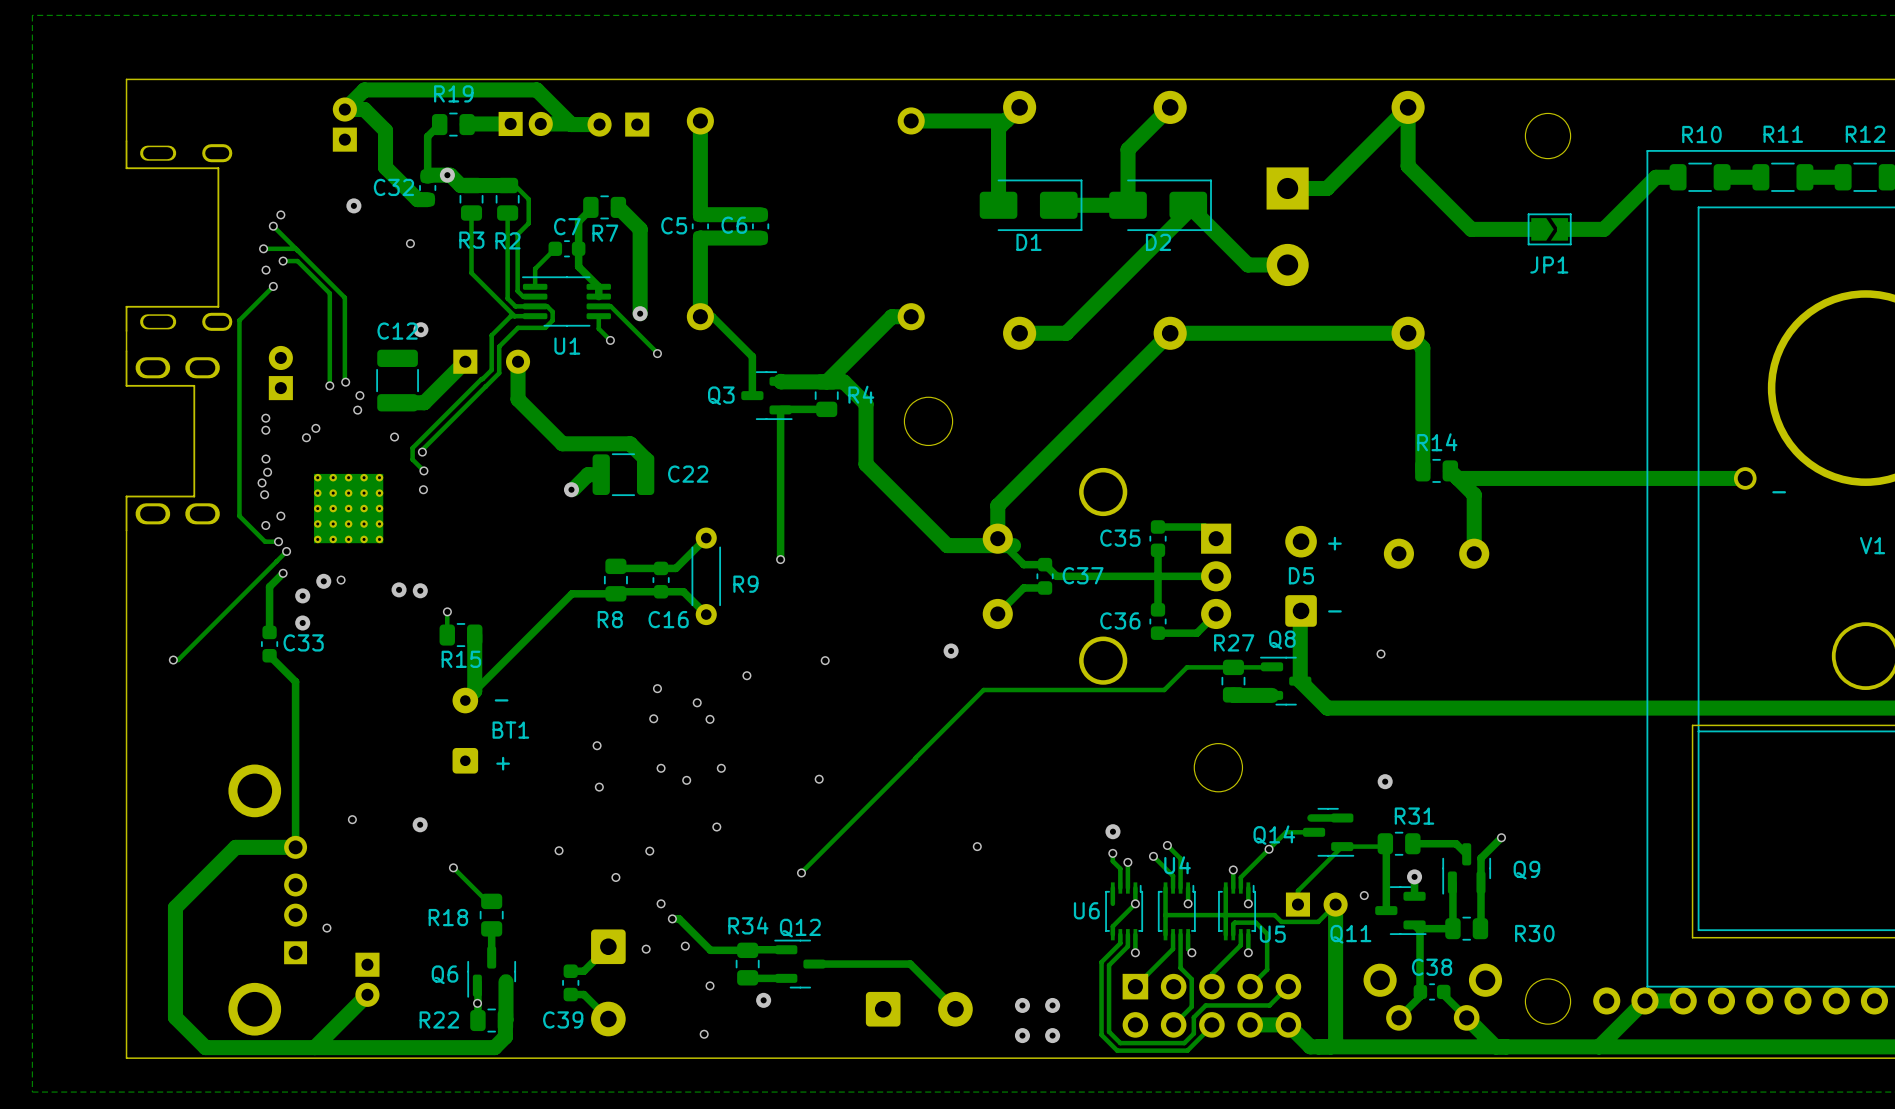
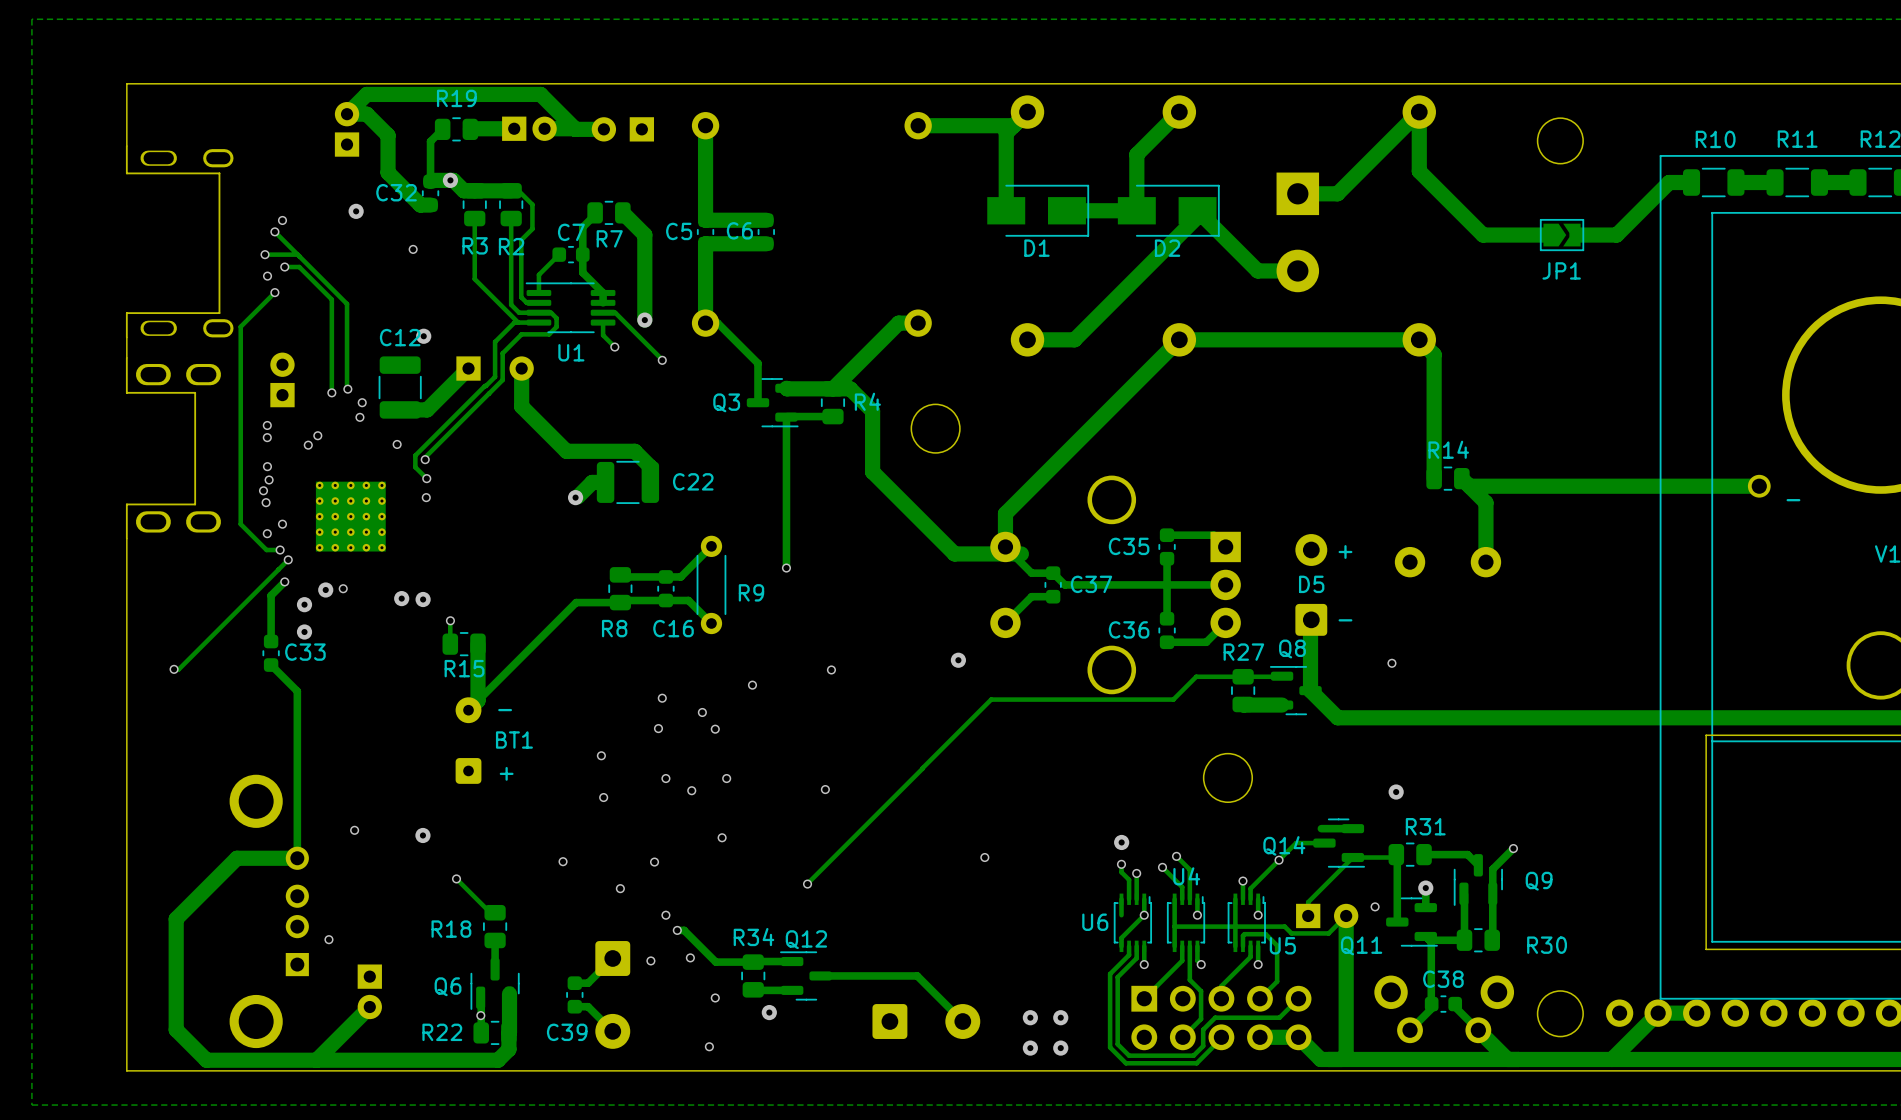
D1 footprint: [979, 179, 1083, 232] -> [987, 184, 1090, 237]
D2 footprint: [1109, 179, 1212, 232] -> [1117, 184, 1220, 237]

